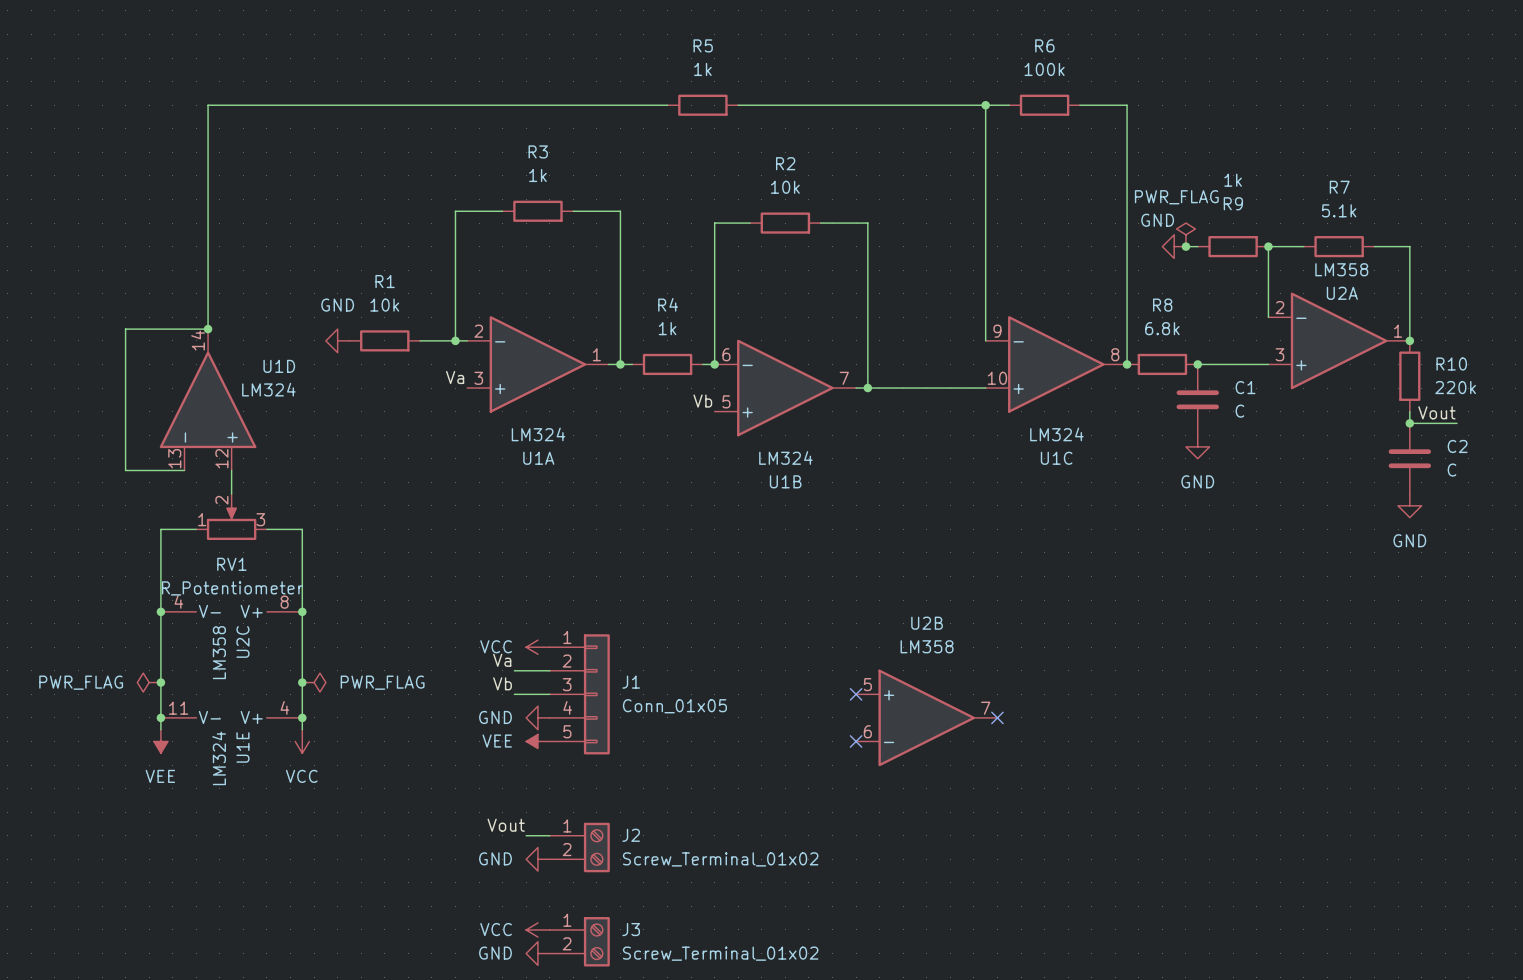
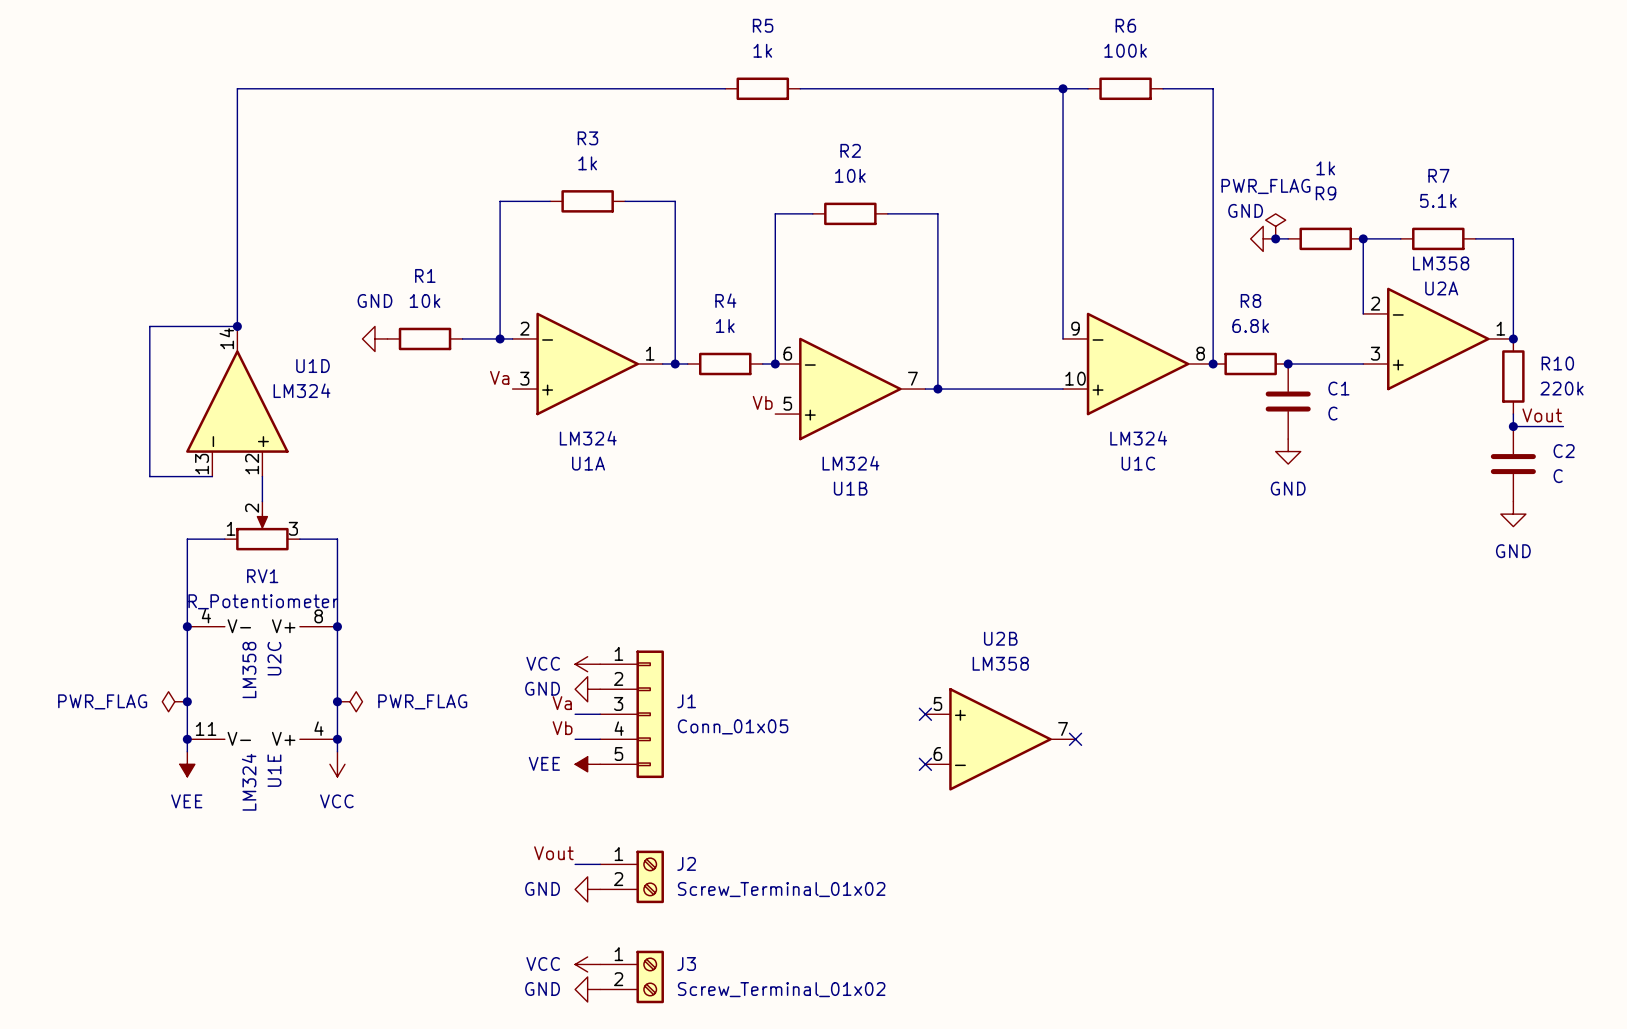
label position: Va (502, 660) -> Va (562, 703)
wire: (514, 670) (549, 670) -> none
label position: Vb (502, 683) -> Vb (562, 728)
wire: (514, 694) (526, 694) -> none
power symbol position: GND (537, 717) -> GND (587, 689)

